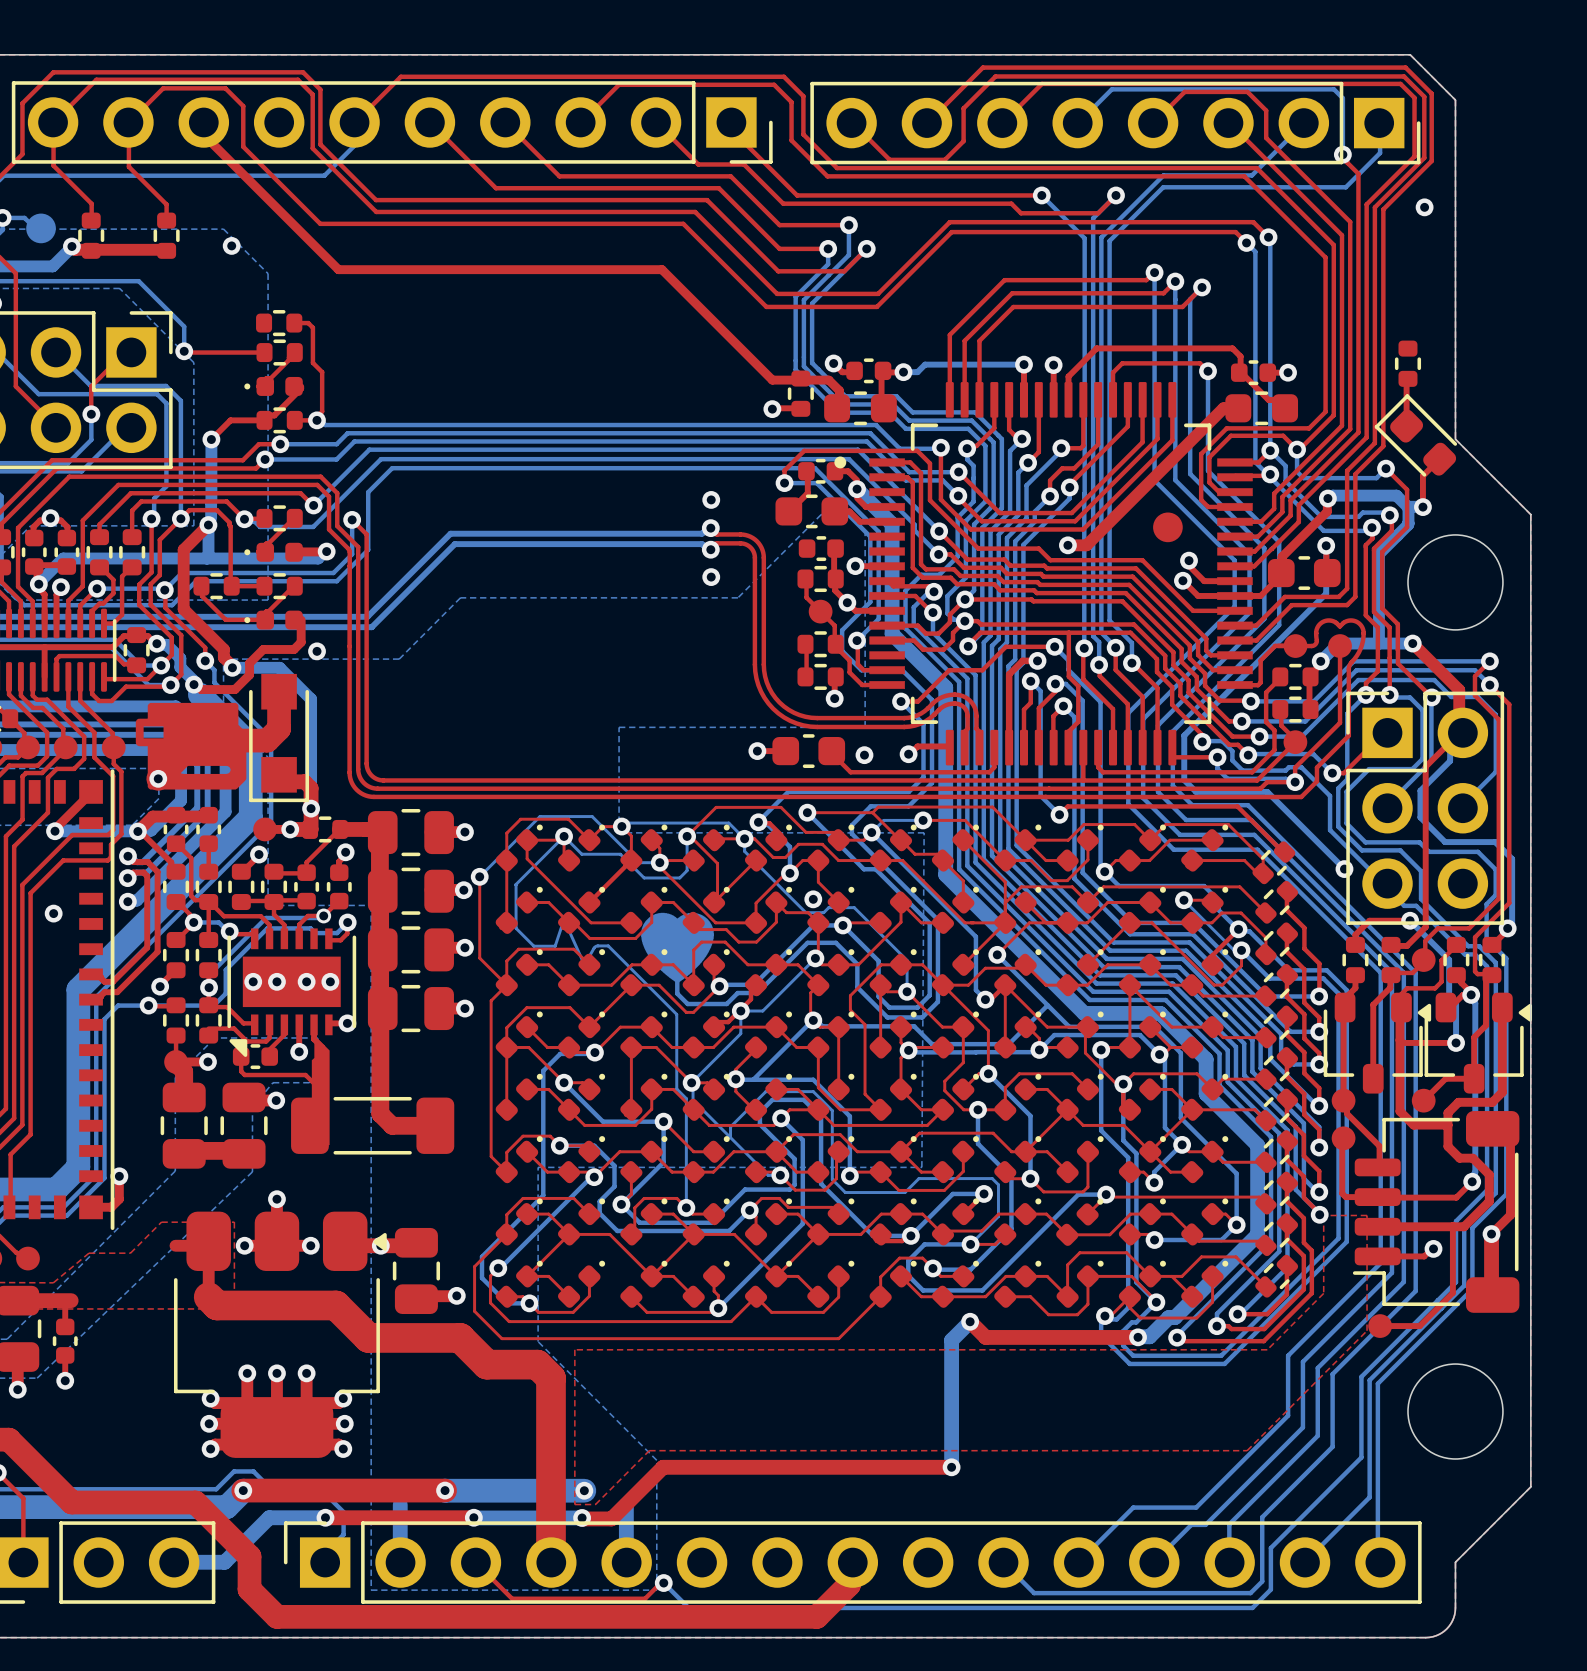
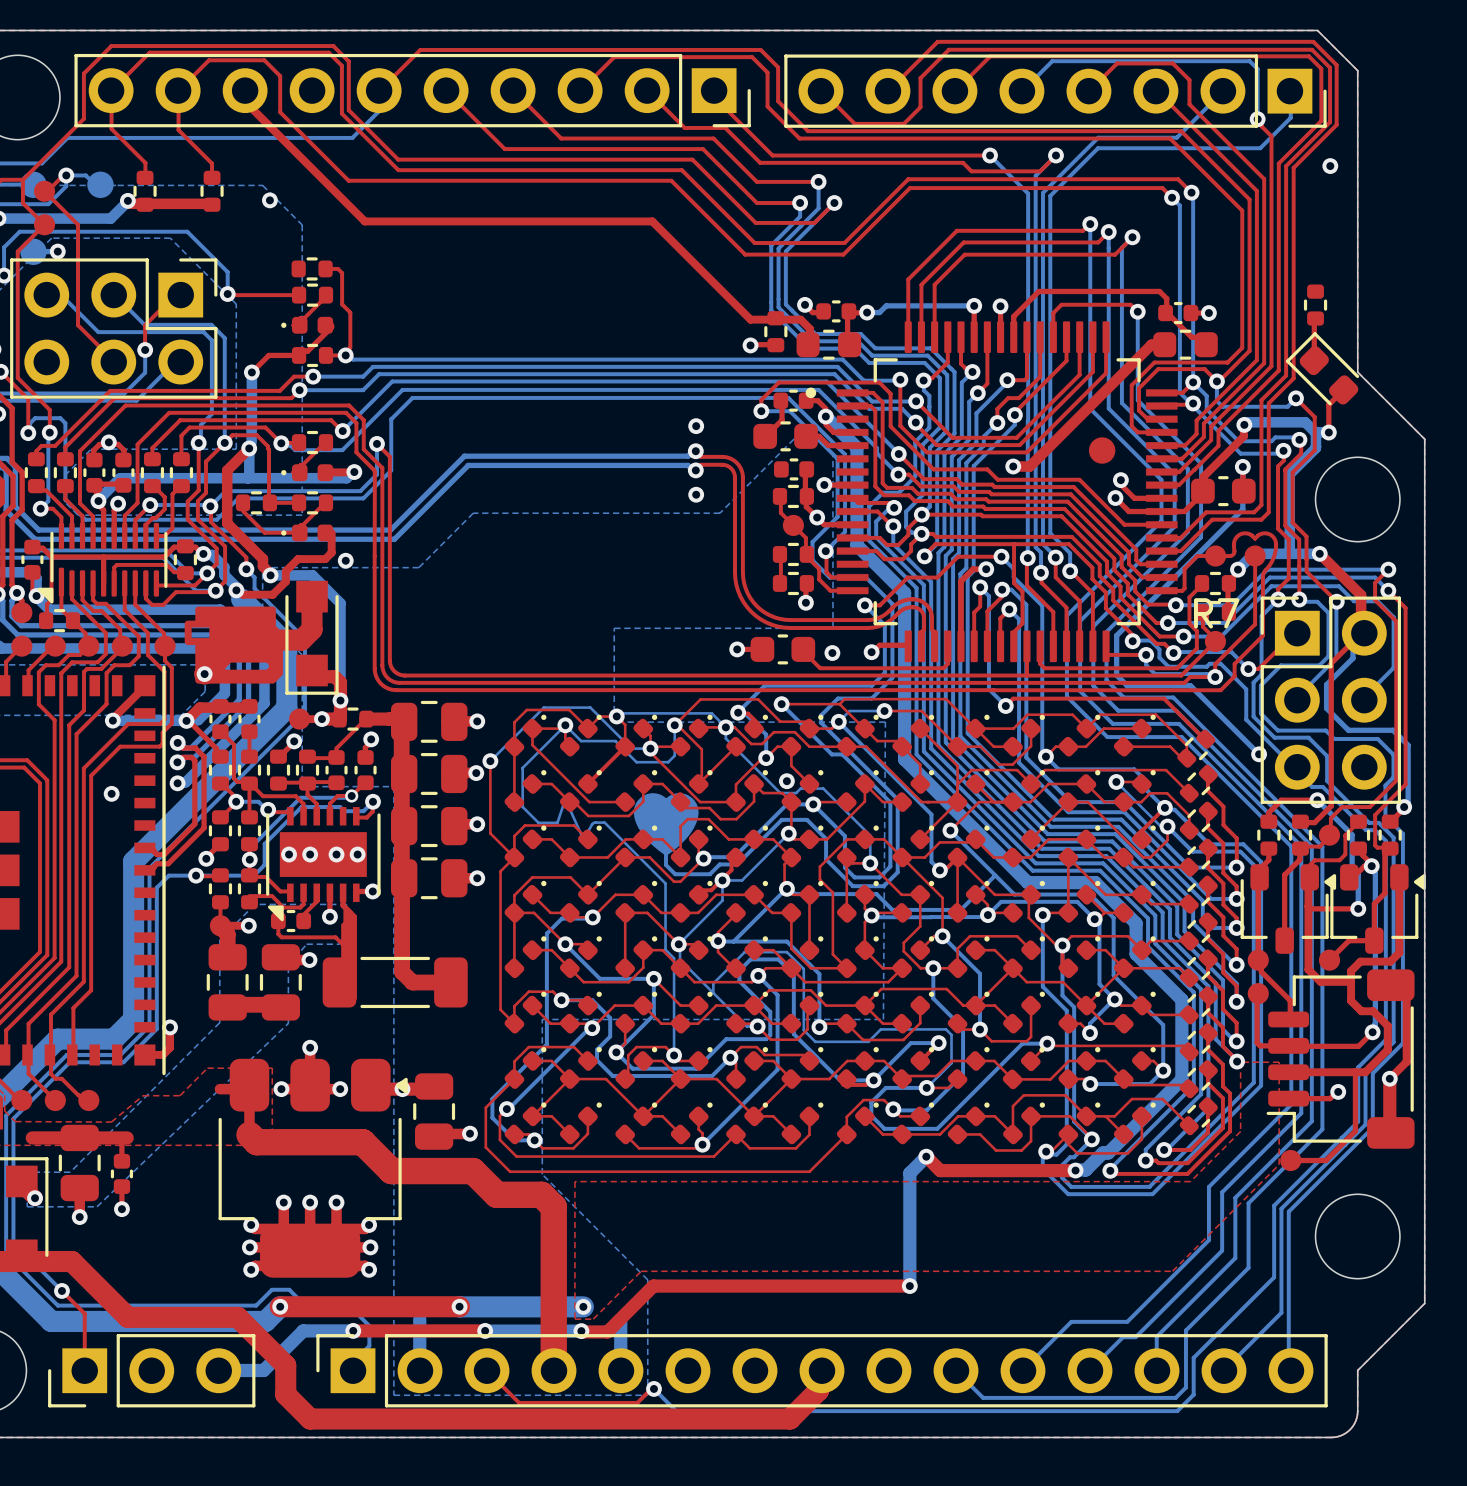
R7 name: none -> R7 (1216, 613)

